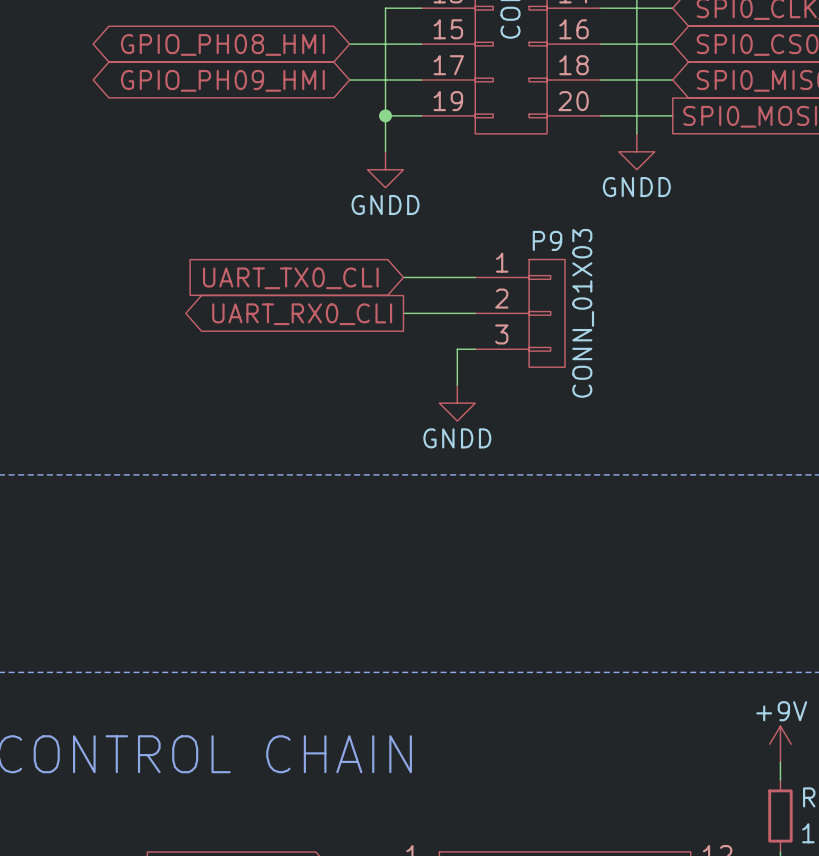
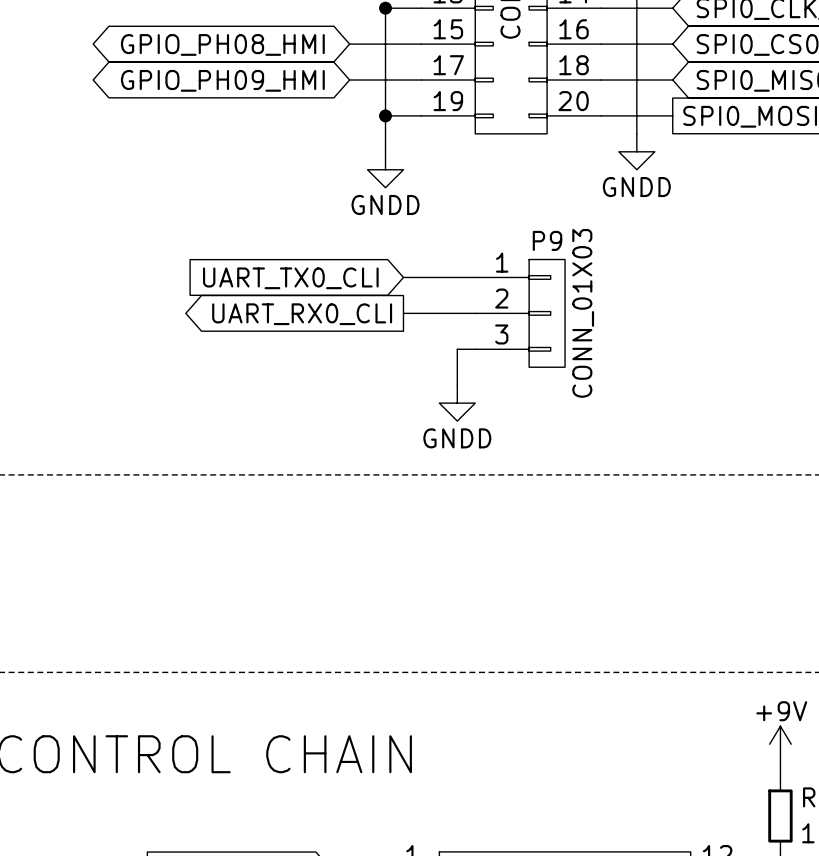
junction: none -> (385, 8)

